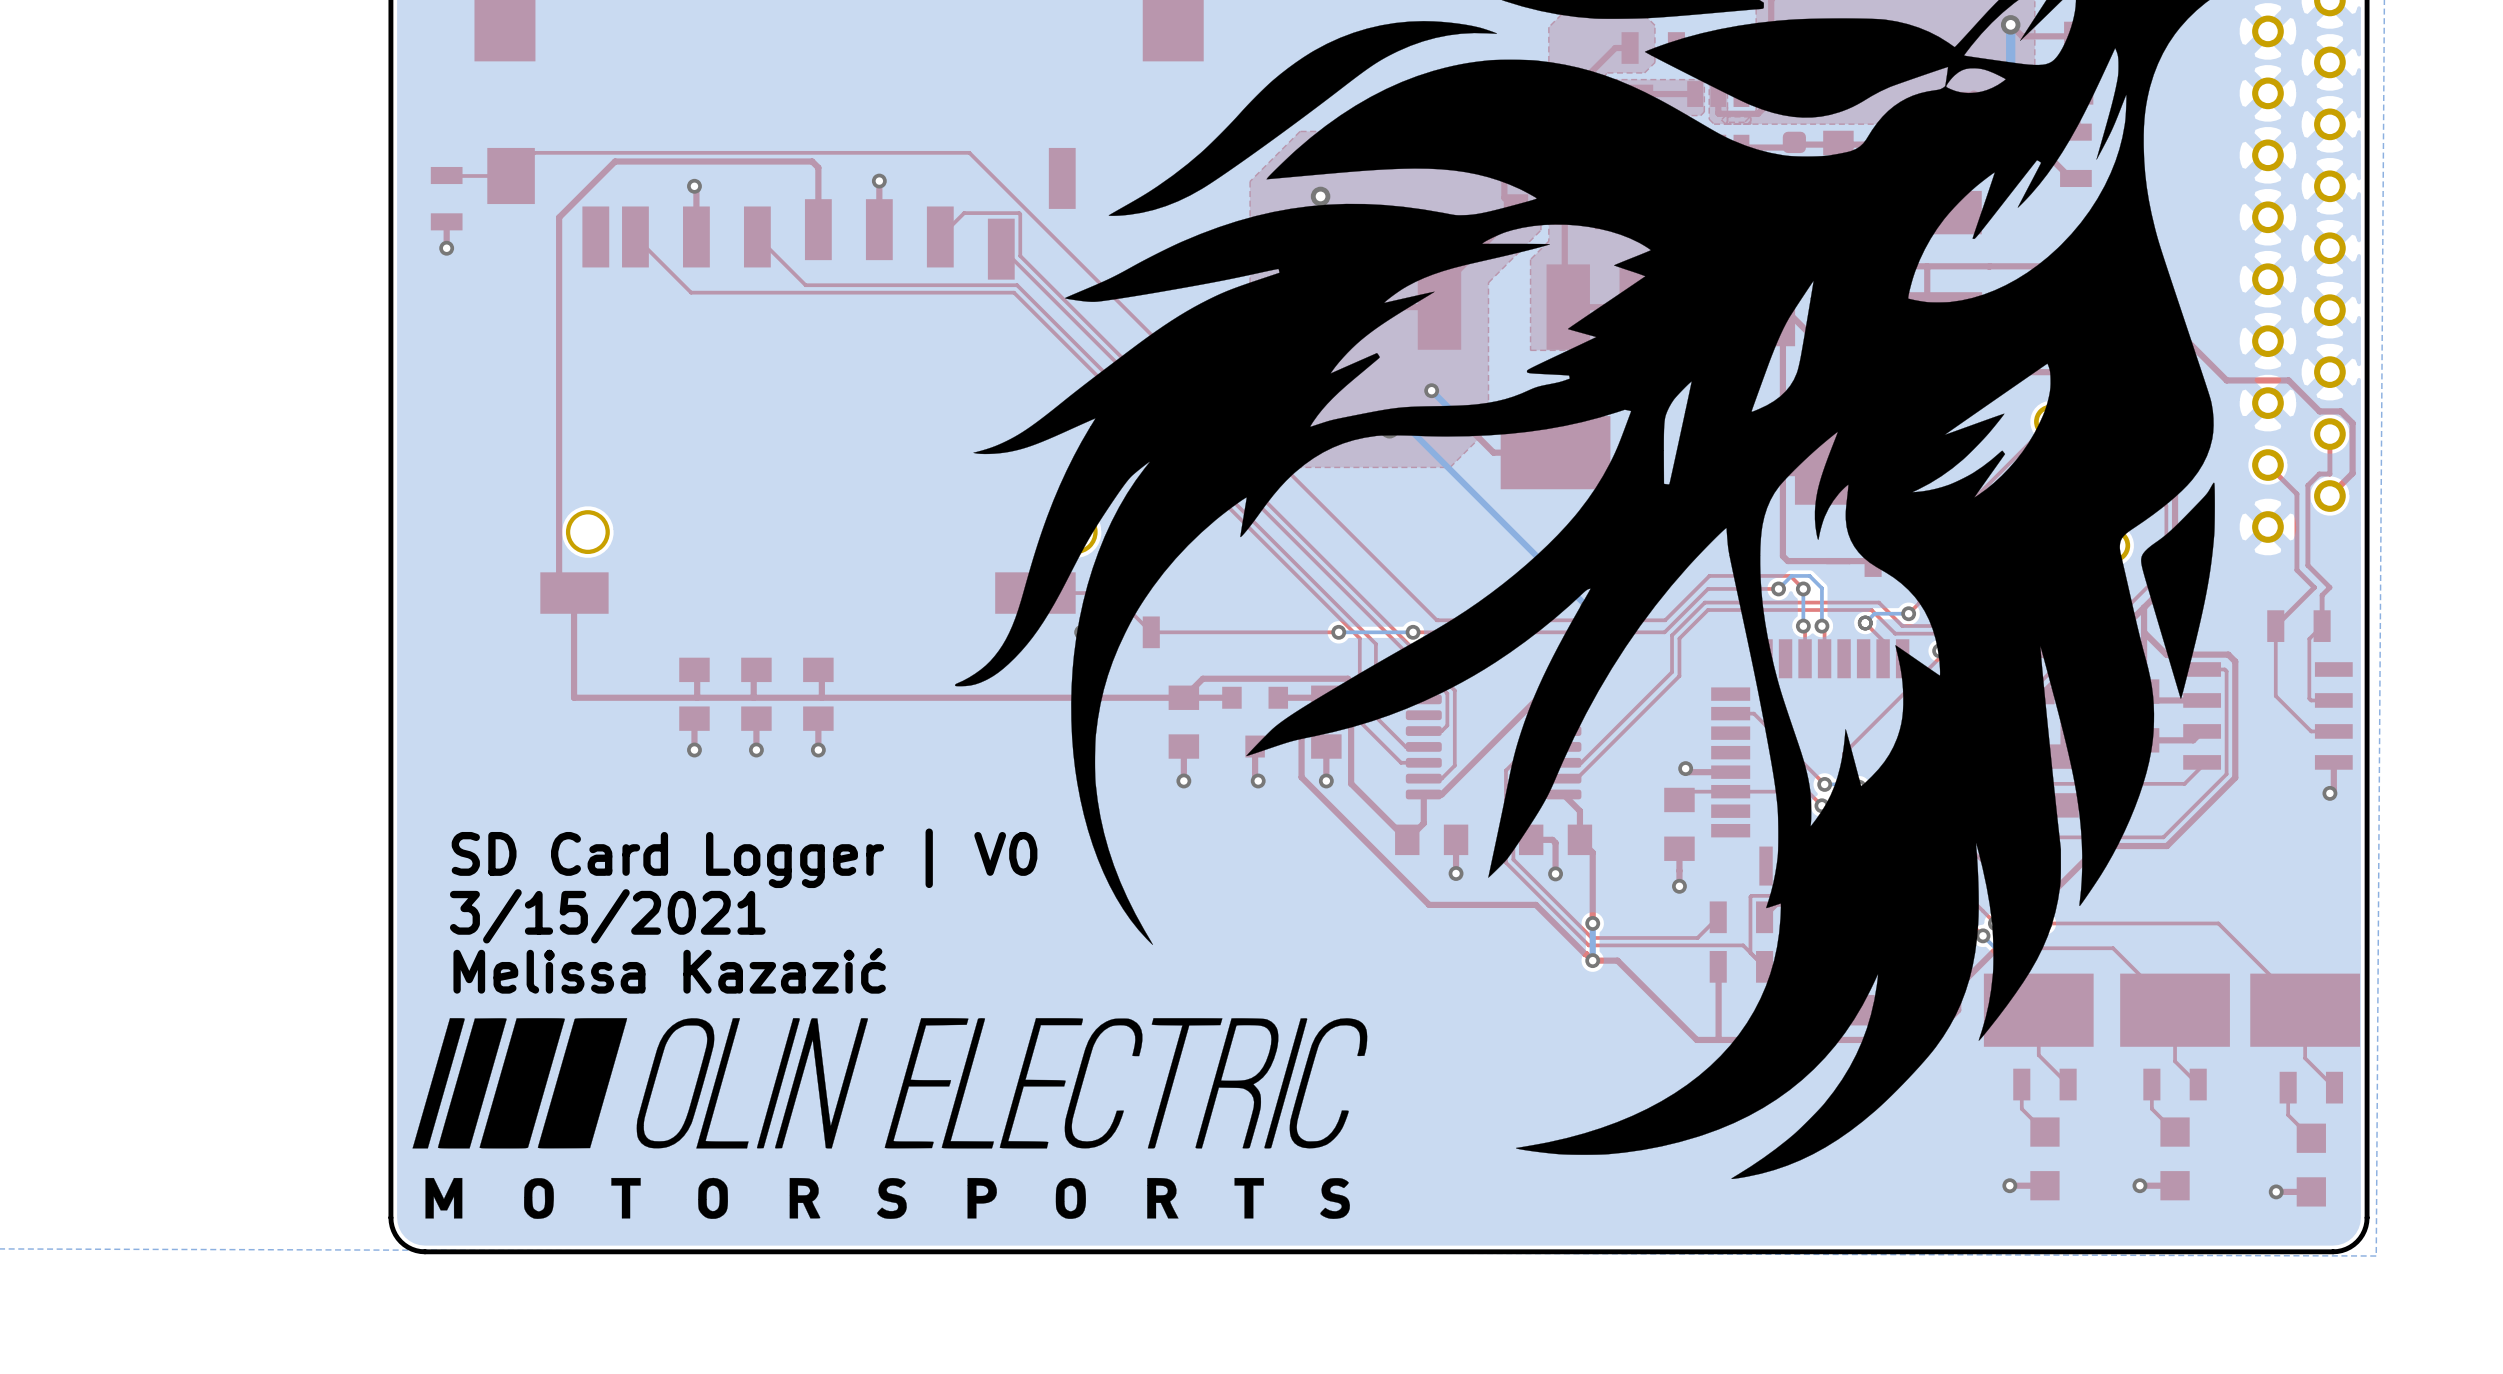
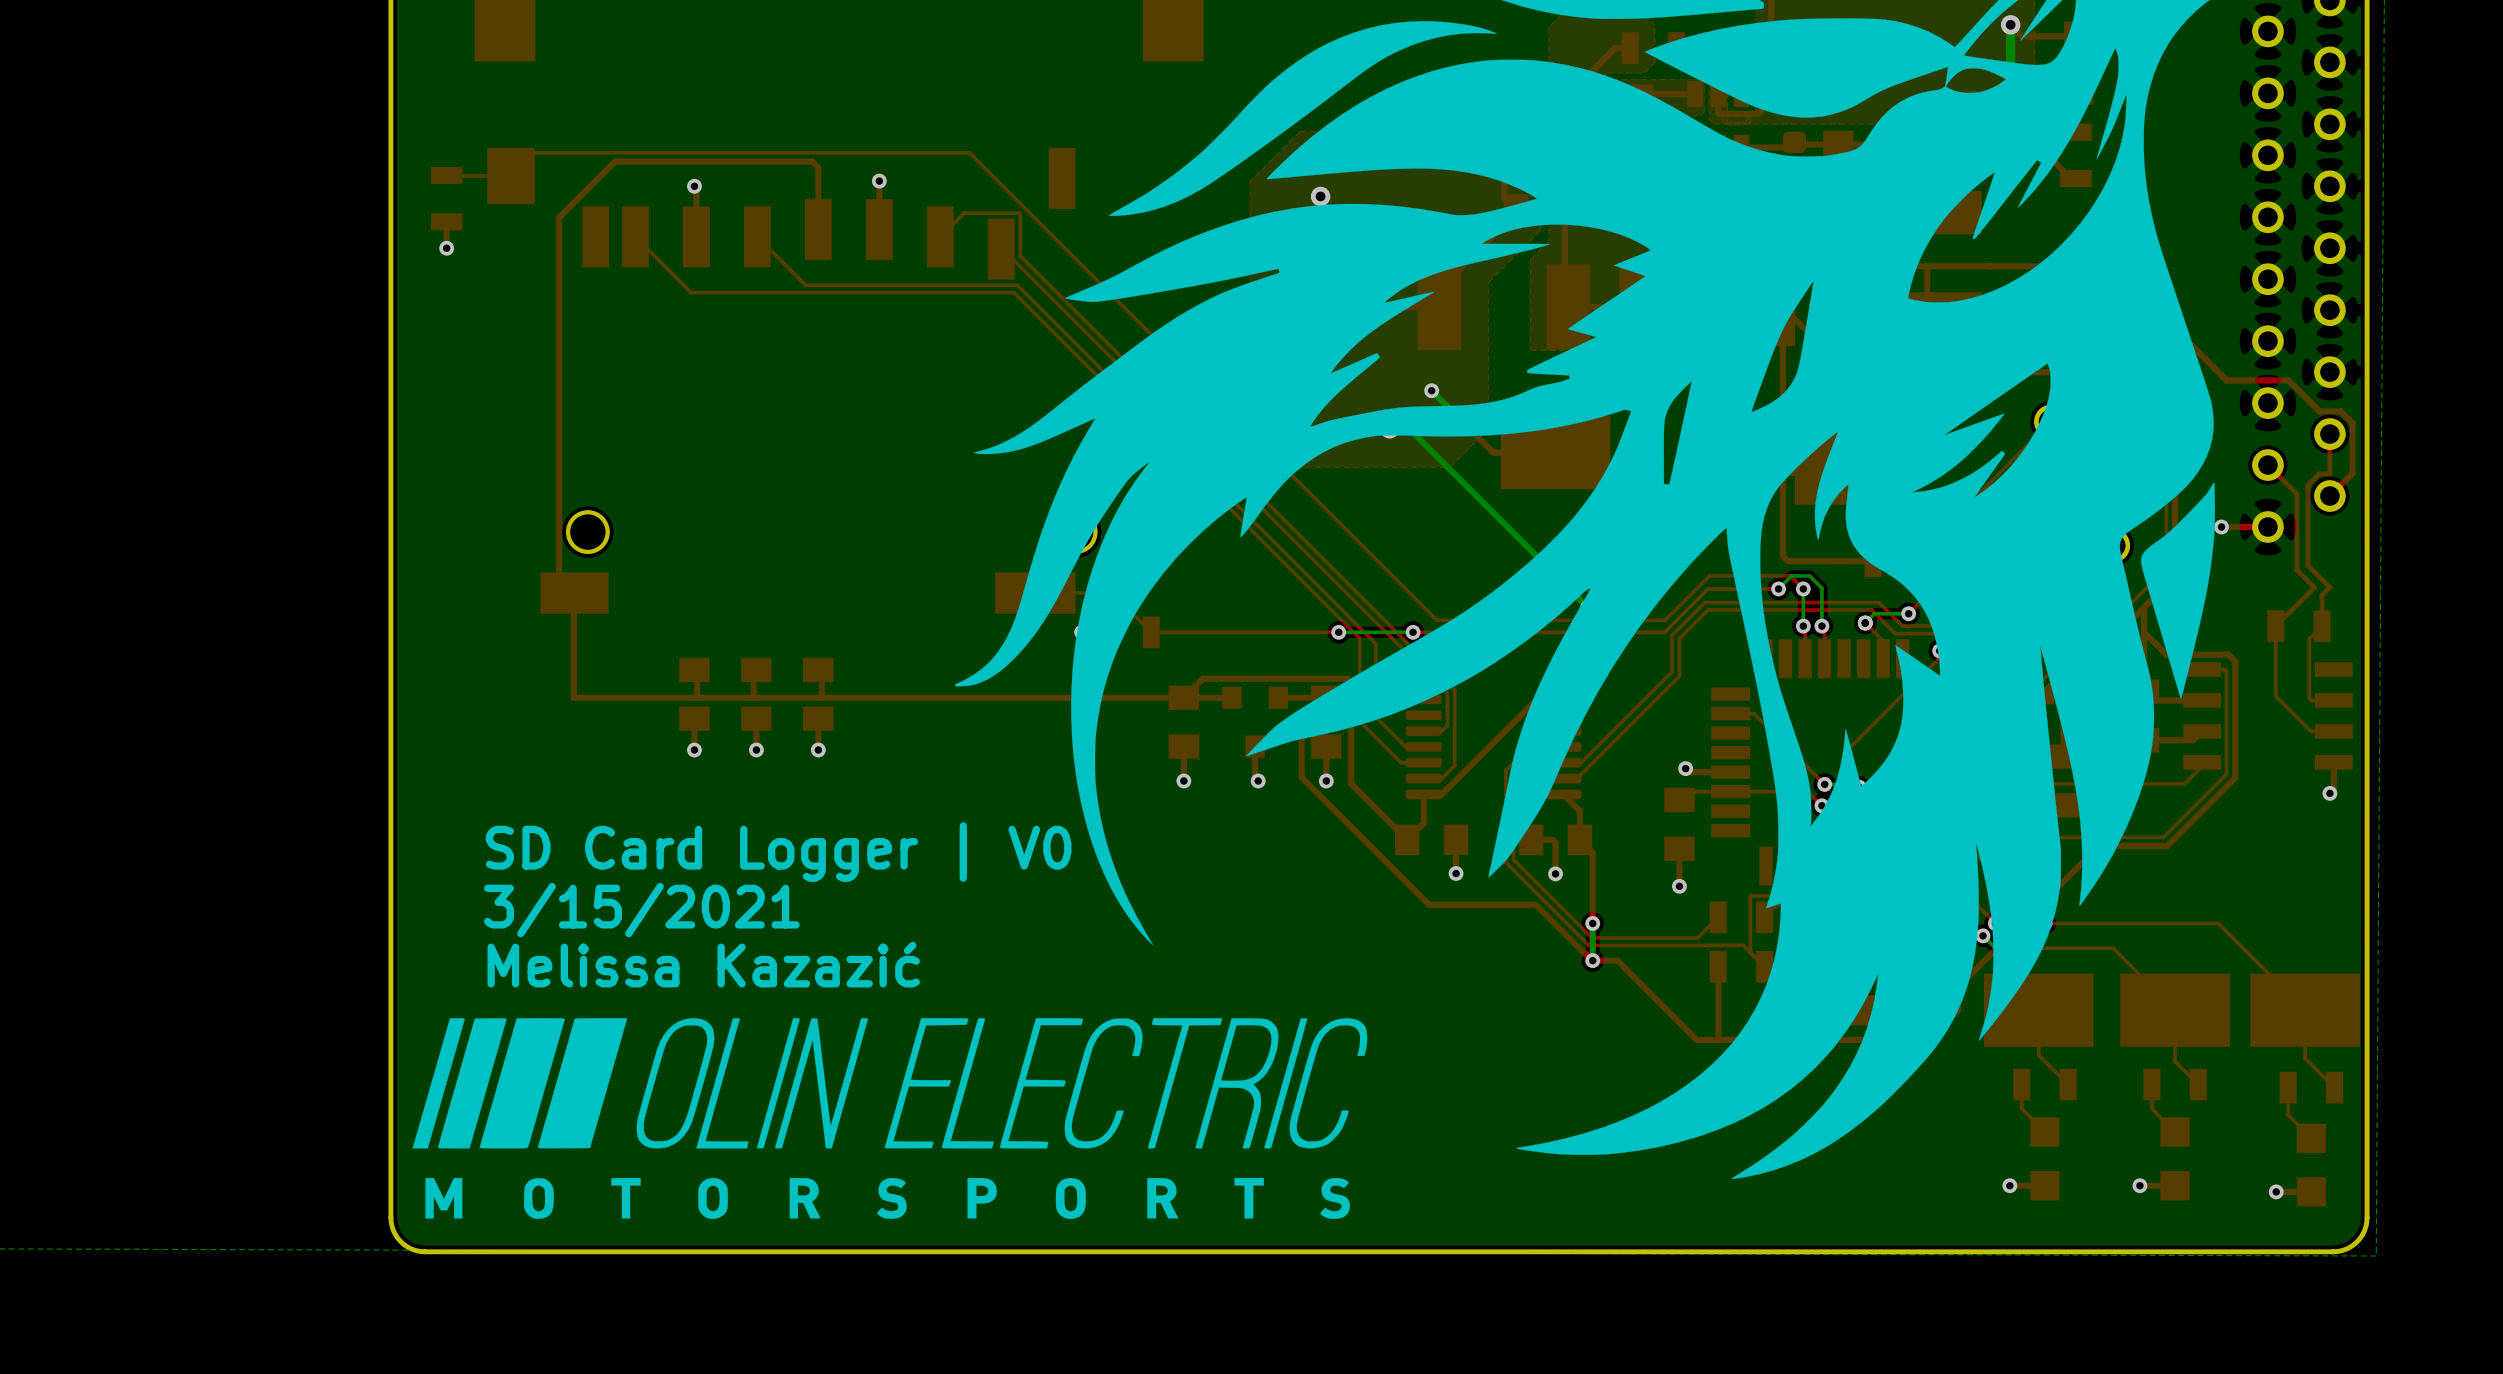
via: none -> (2221, 527)
top track: none -> (2267, 527) (2221, 527)
text position: SD Card Logger | V0 (744, 858) -> SD Card Logger | V0 (778, 852)
text position: 3/15/2021 (607, 916) -> 3/15/2021 (641, 910)
text position: Melissa Kazazić (669, 970) -> Melissa Kazazić (703, 964)

